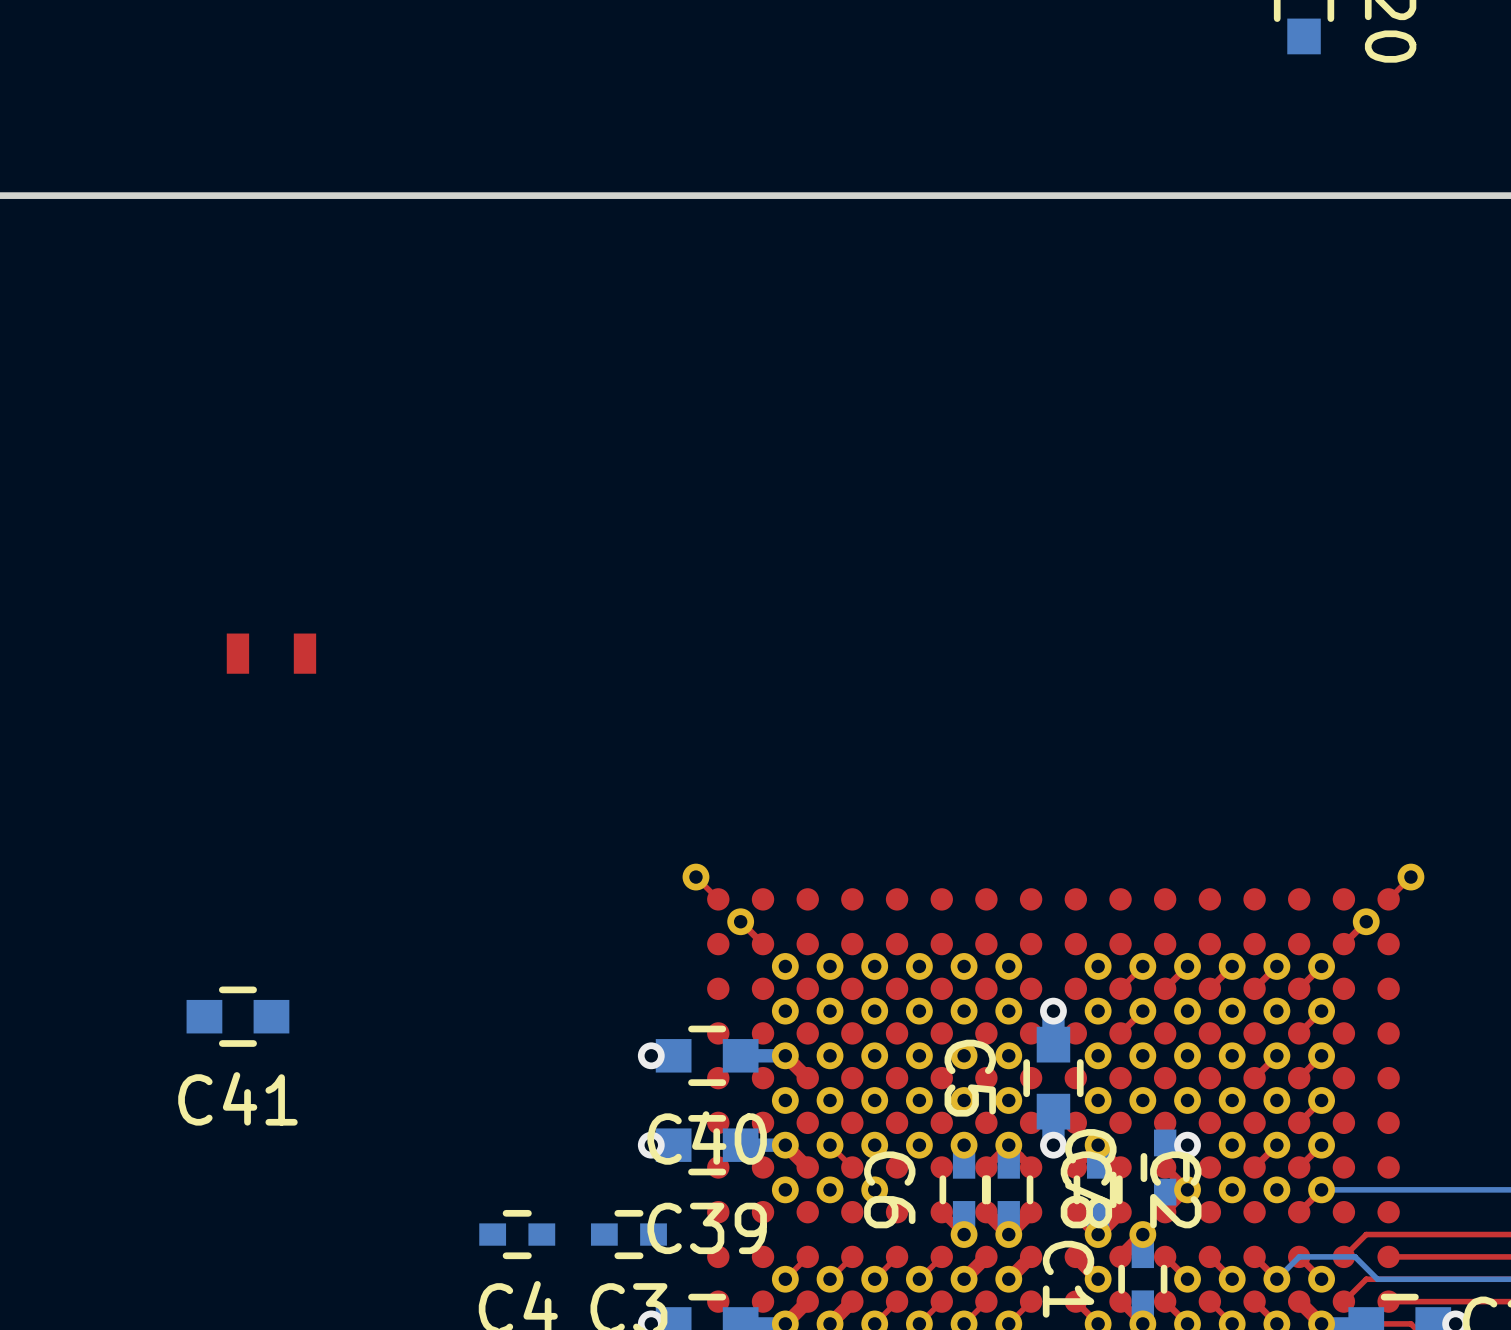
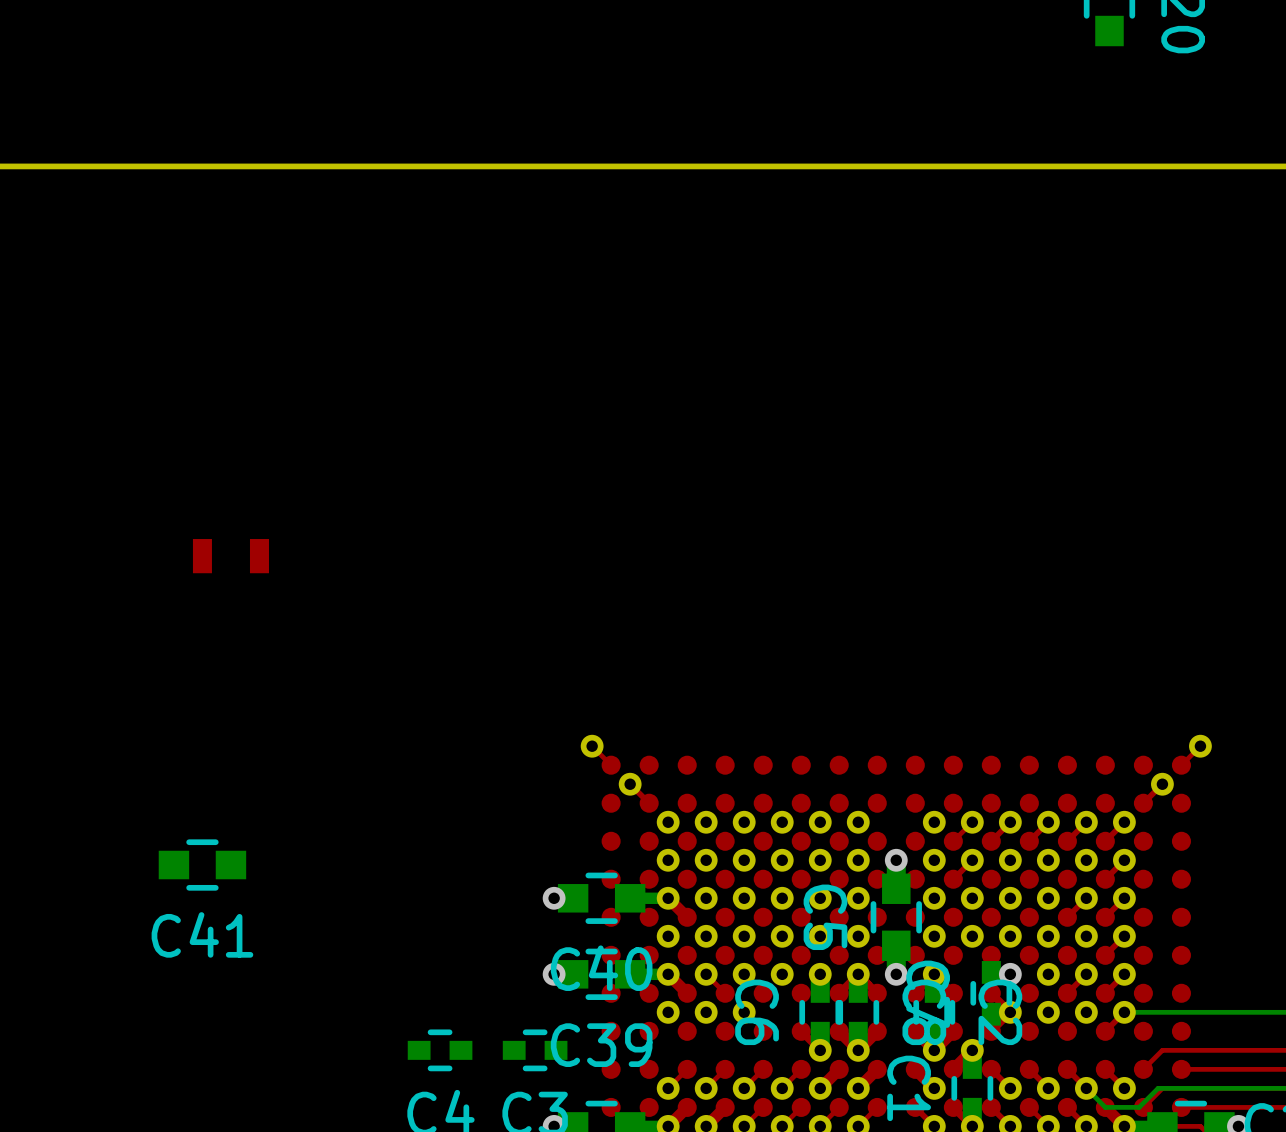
bottom track: (1377, 1279) (1355, 1256) (1299, 1256) (1276, 1279) -> (1171, 1088) (1158, 1088) (1139, 1107) (1105, 1107) (1086, 1088)

